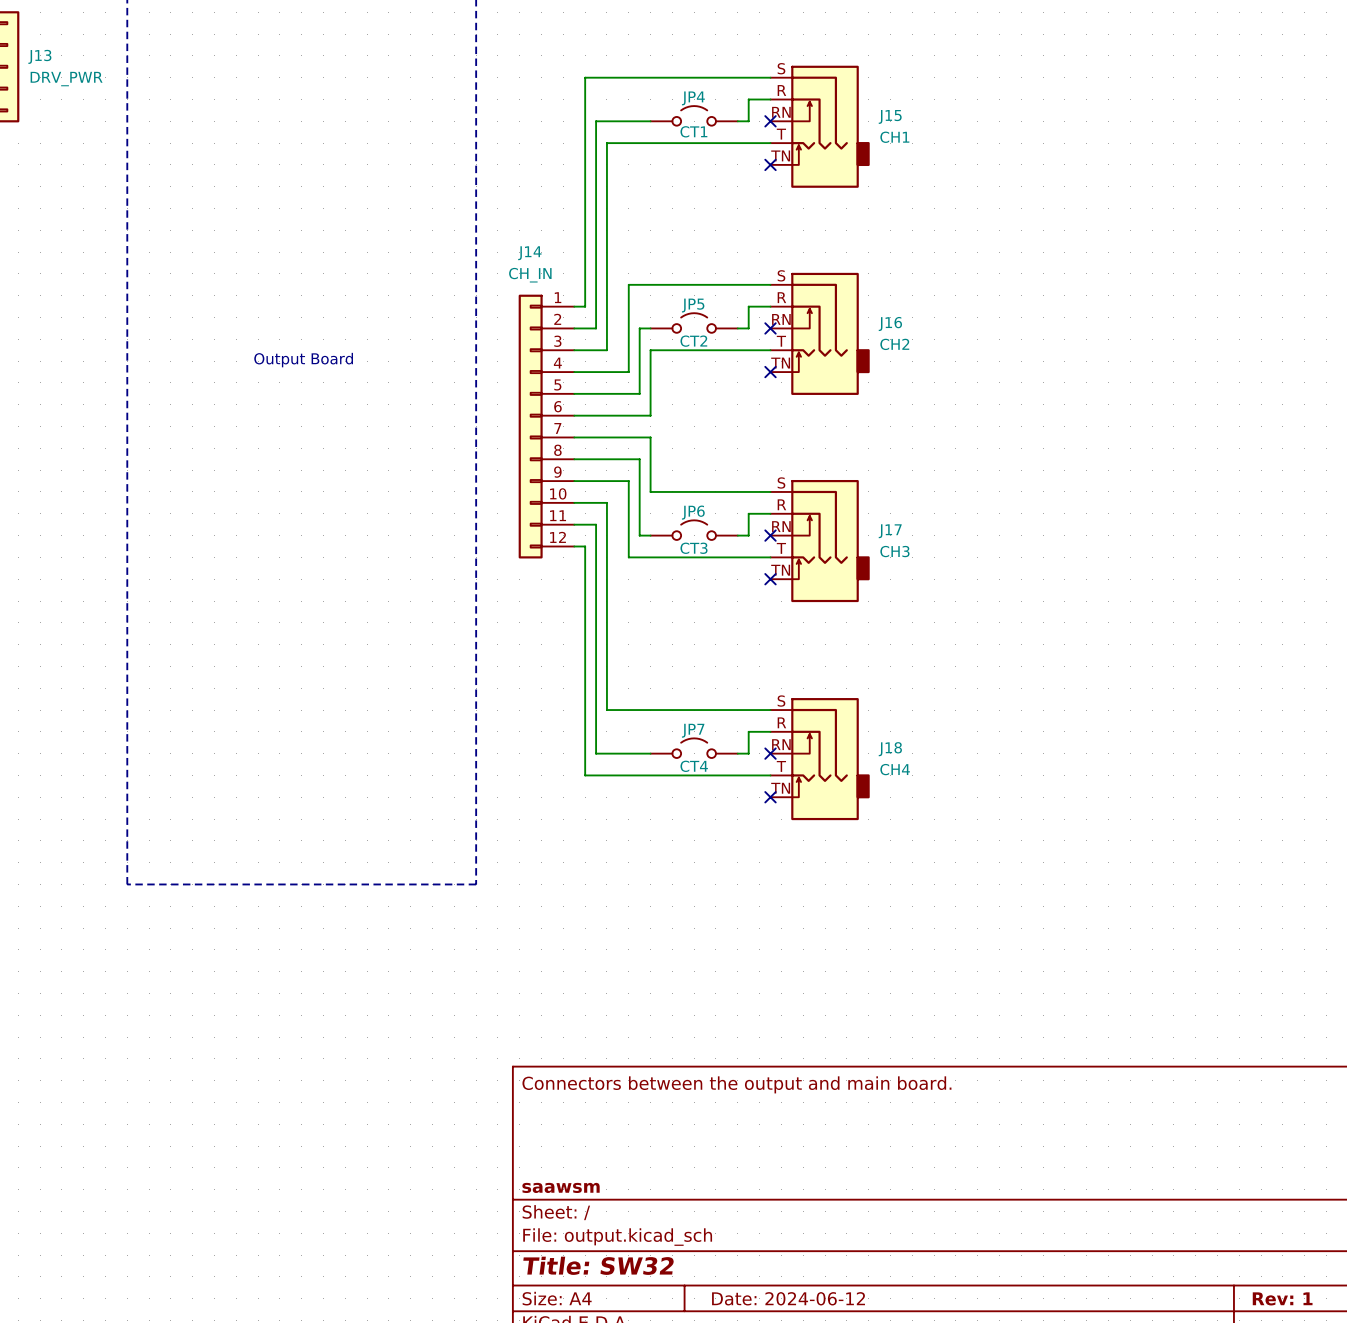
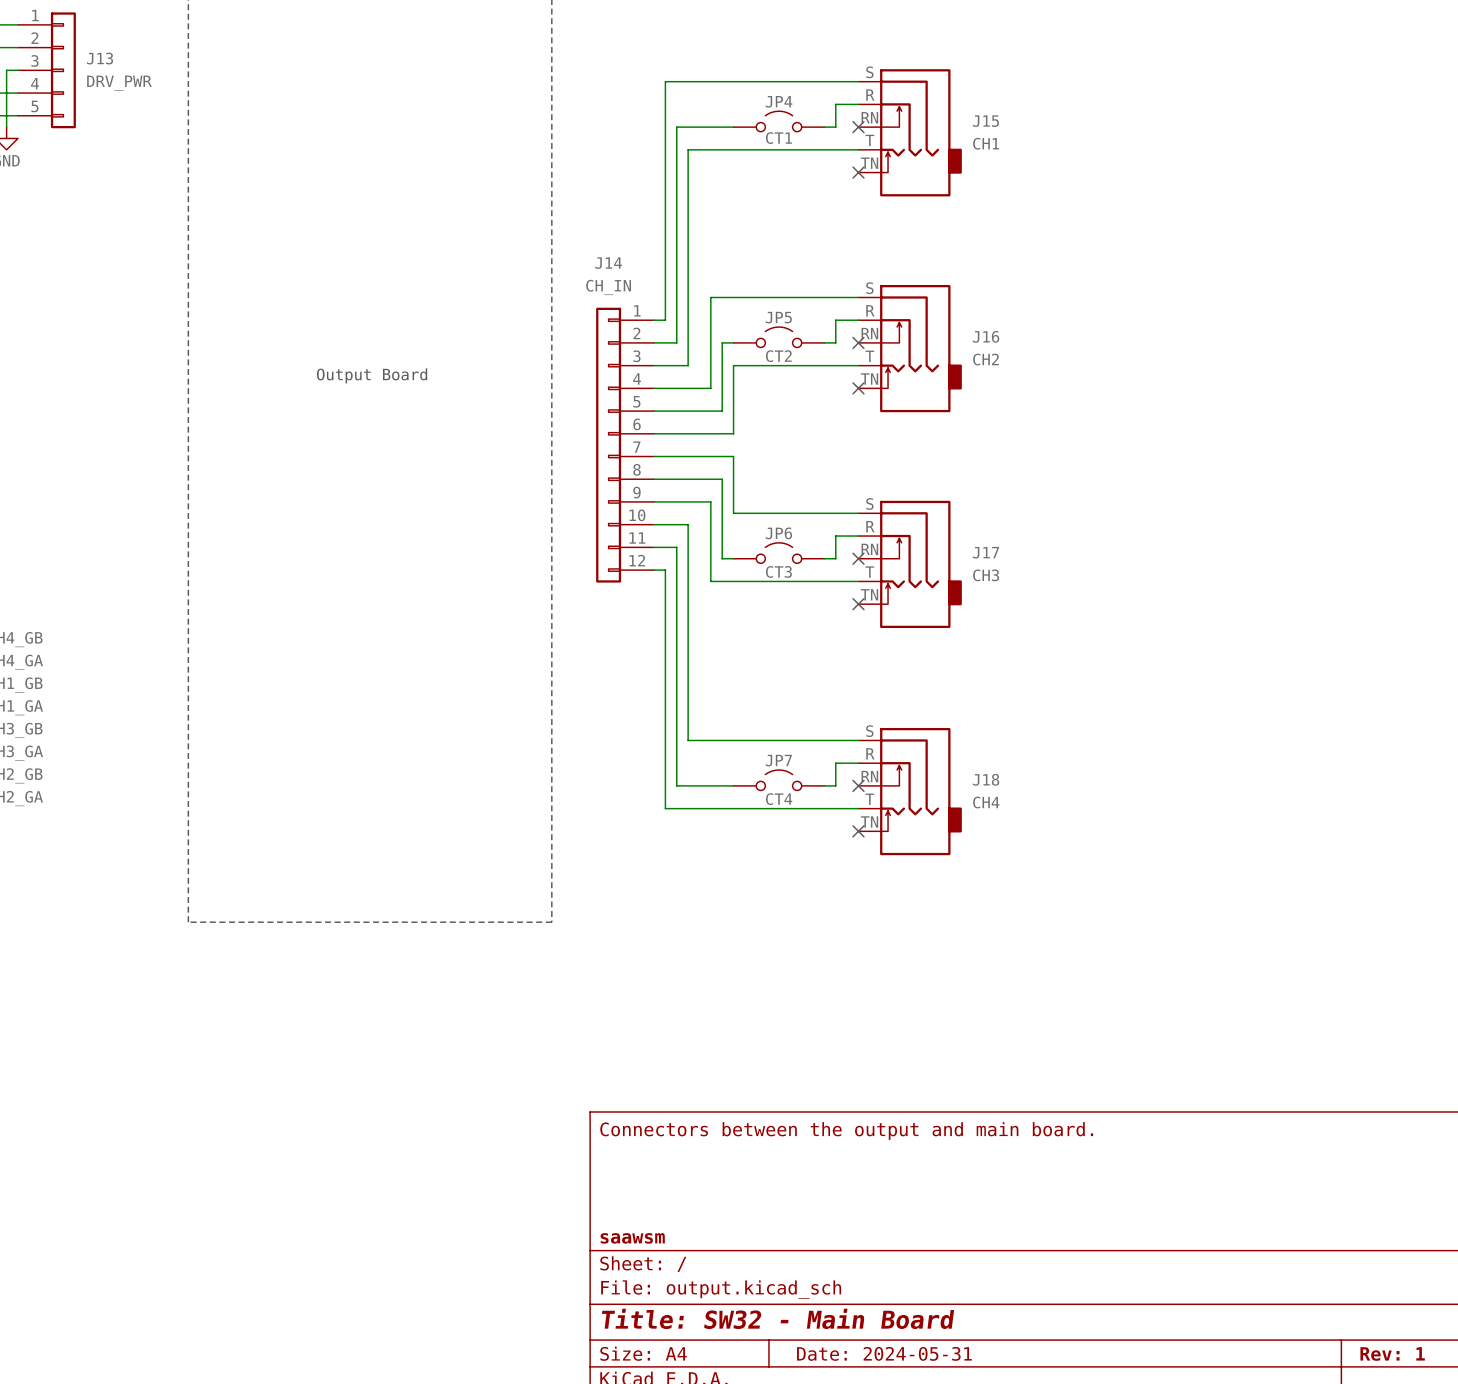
title block: Title: SW32 (598, 1265) -> Title: SW32 - Main Board (778, 1318)
title block: Date: 2024-06-12 (788, 1298) -> Date: 2024-05-31 (884, 1353)

